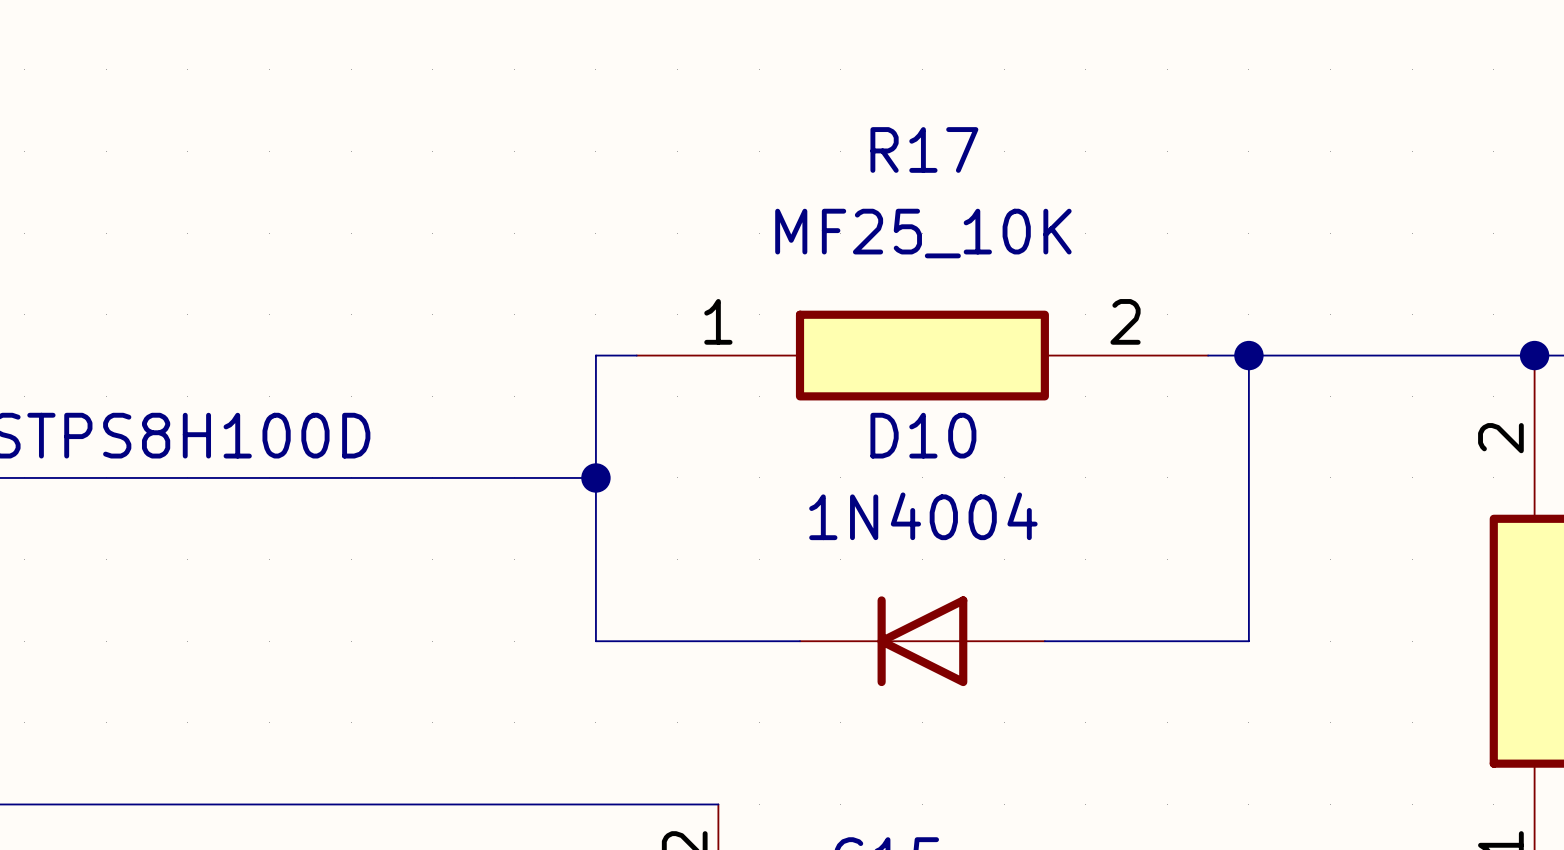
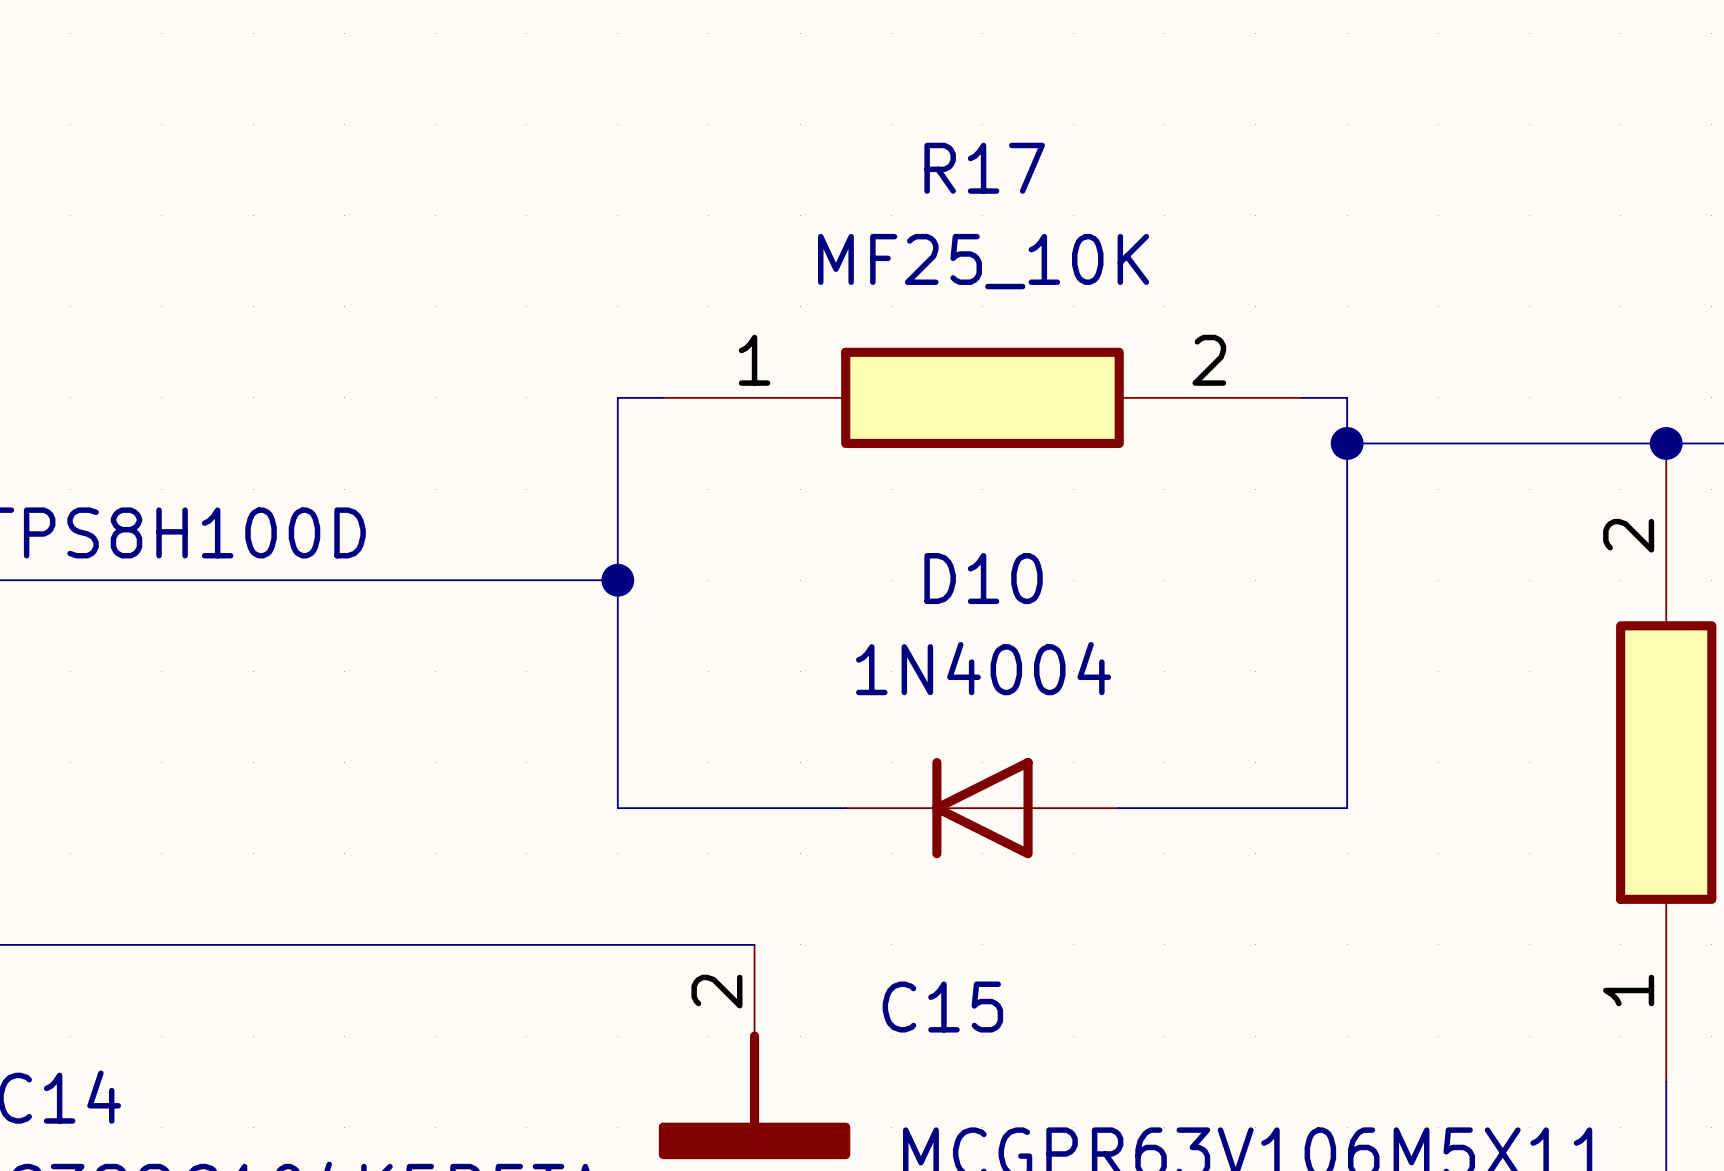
wire: (595, 355) (636, 355) -> (617, 443) (617, 397) (663, 397)
R17 position: (922, 355) -> (982, 397)
wire: (1208, 355) (1248, 355) -> (1301, 397) (1347, 397) (1347, 443)
wire: (595, 641) (800, 641) -> (617, 762) (617, 808) (845, 808)
D10 position: (922, 641) -> (982, 808)
wire: (1044, 641) (1248, 641) -> (1119, 808) (1347, 808) (1347, 762)

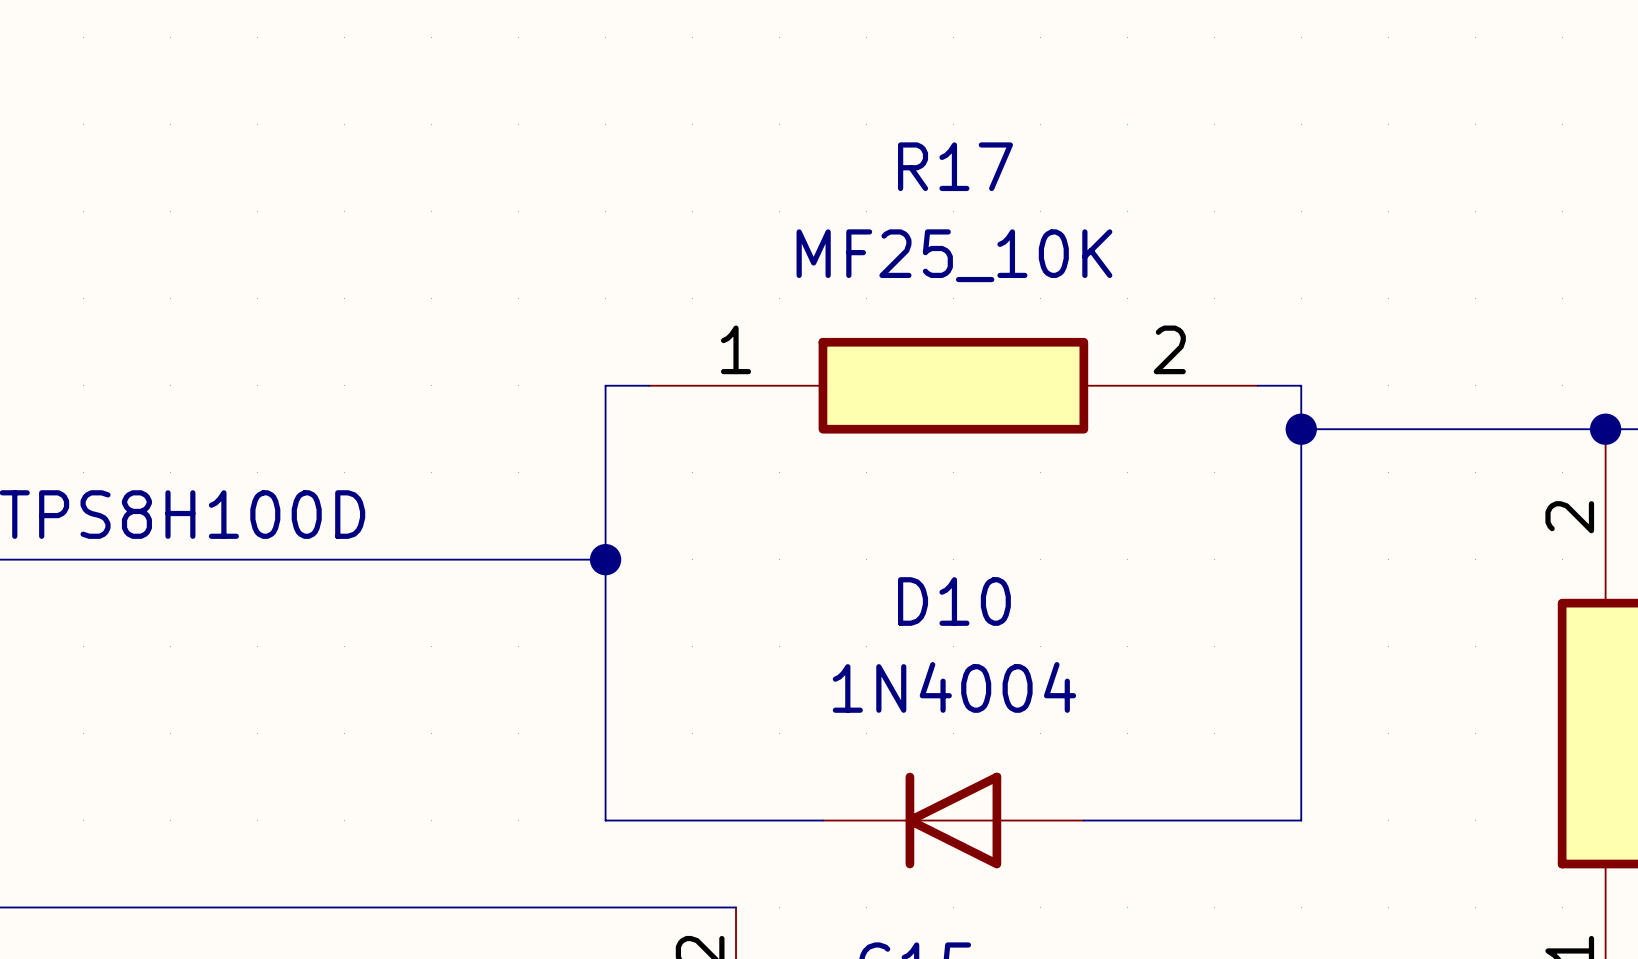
wire: (617, 808) (845, 808) -> (605, 777) (605, 820) (822, 820)
D10 position: (982, 808) -> (953, 820)
wire: (1119, 808) (1347, 808) -> (1083, 820) (1301, 820) (1301, 777)

